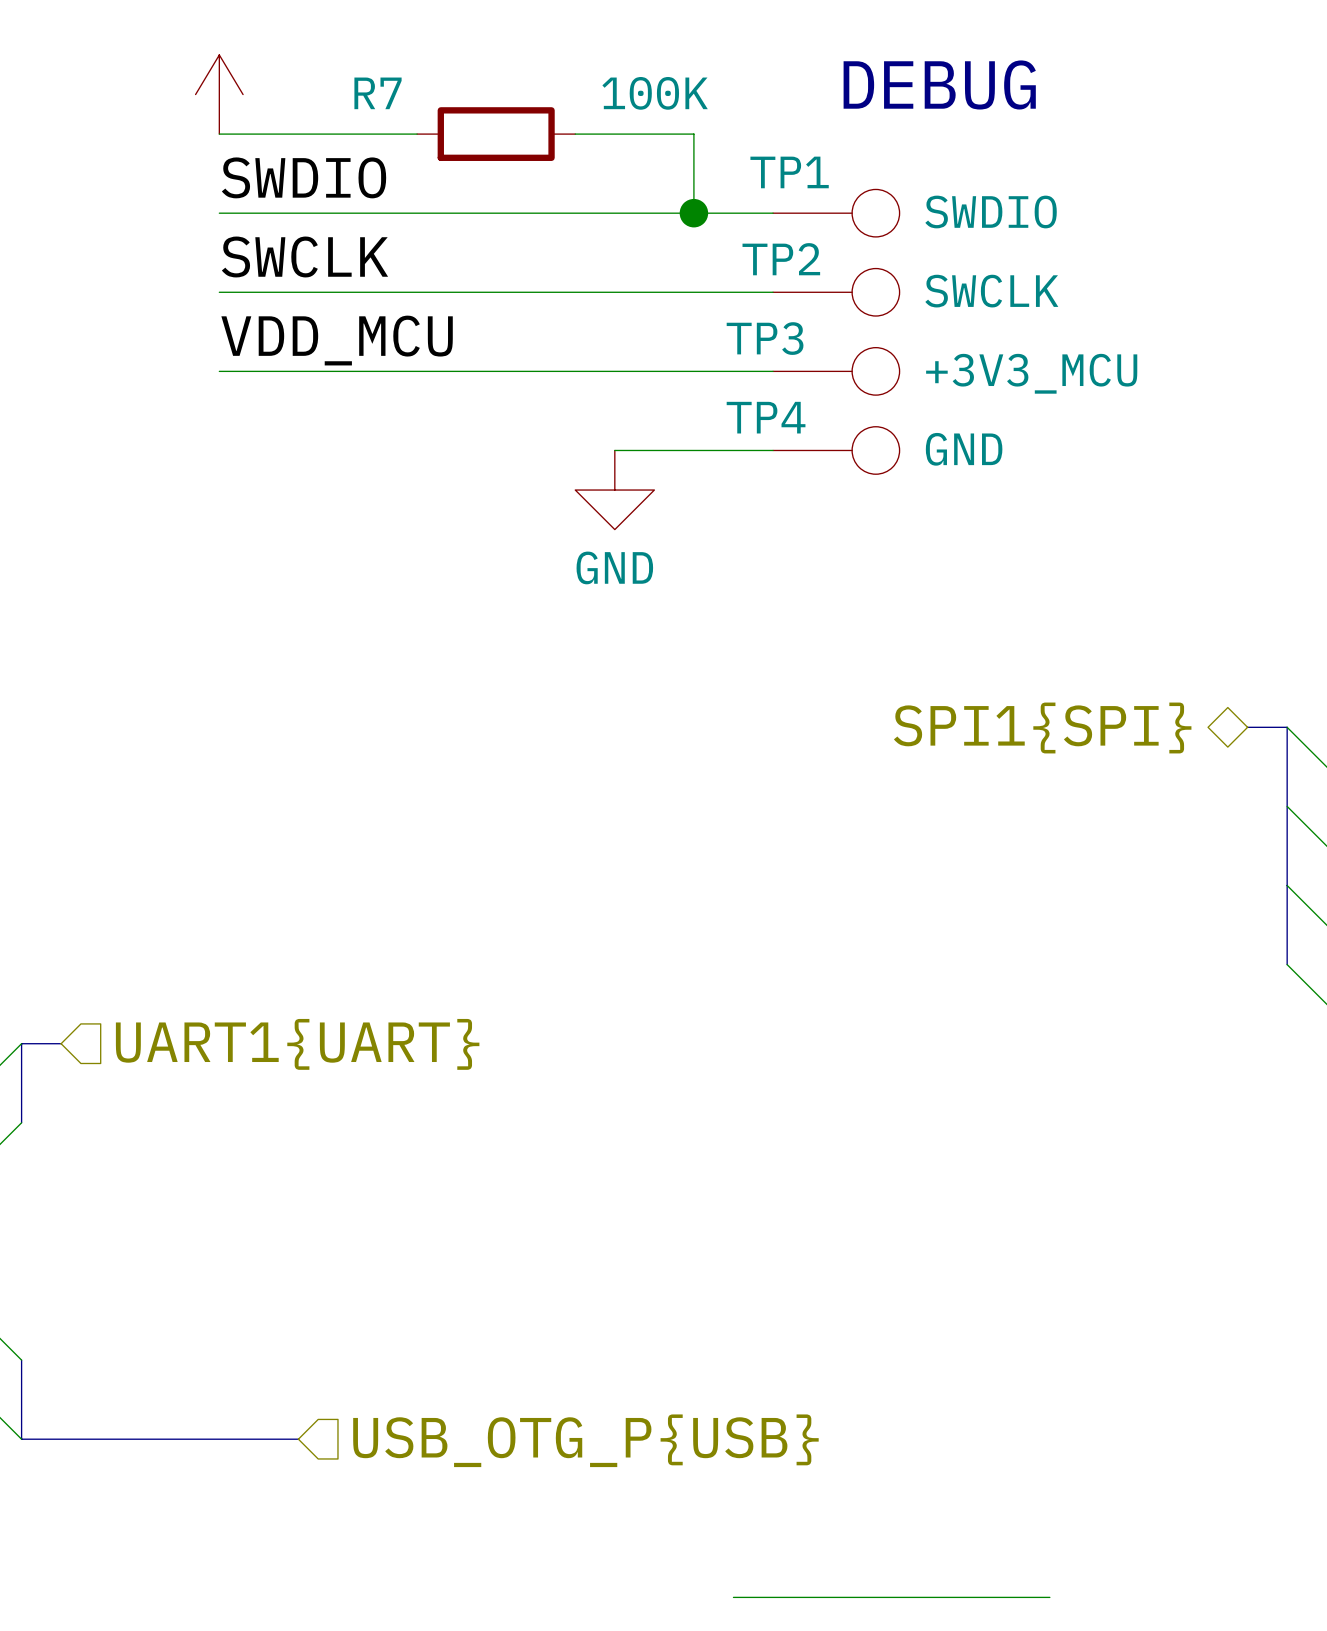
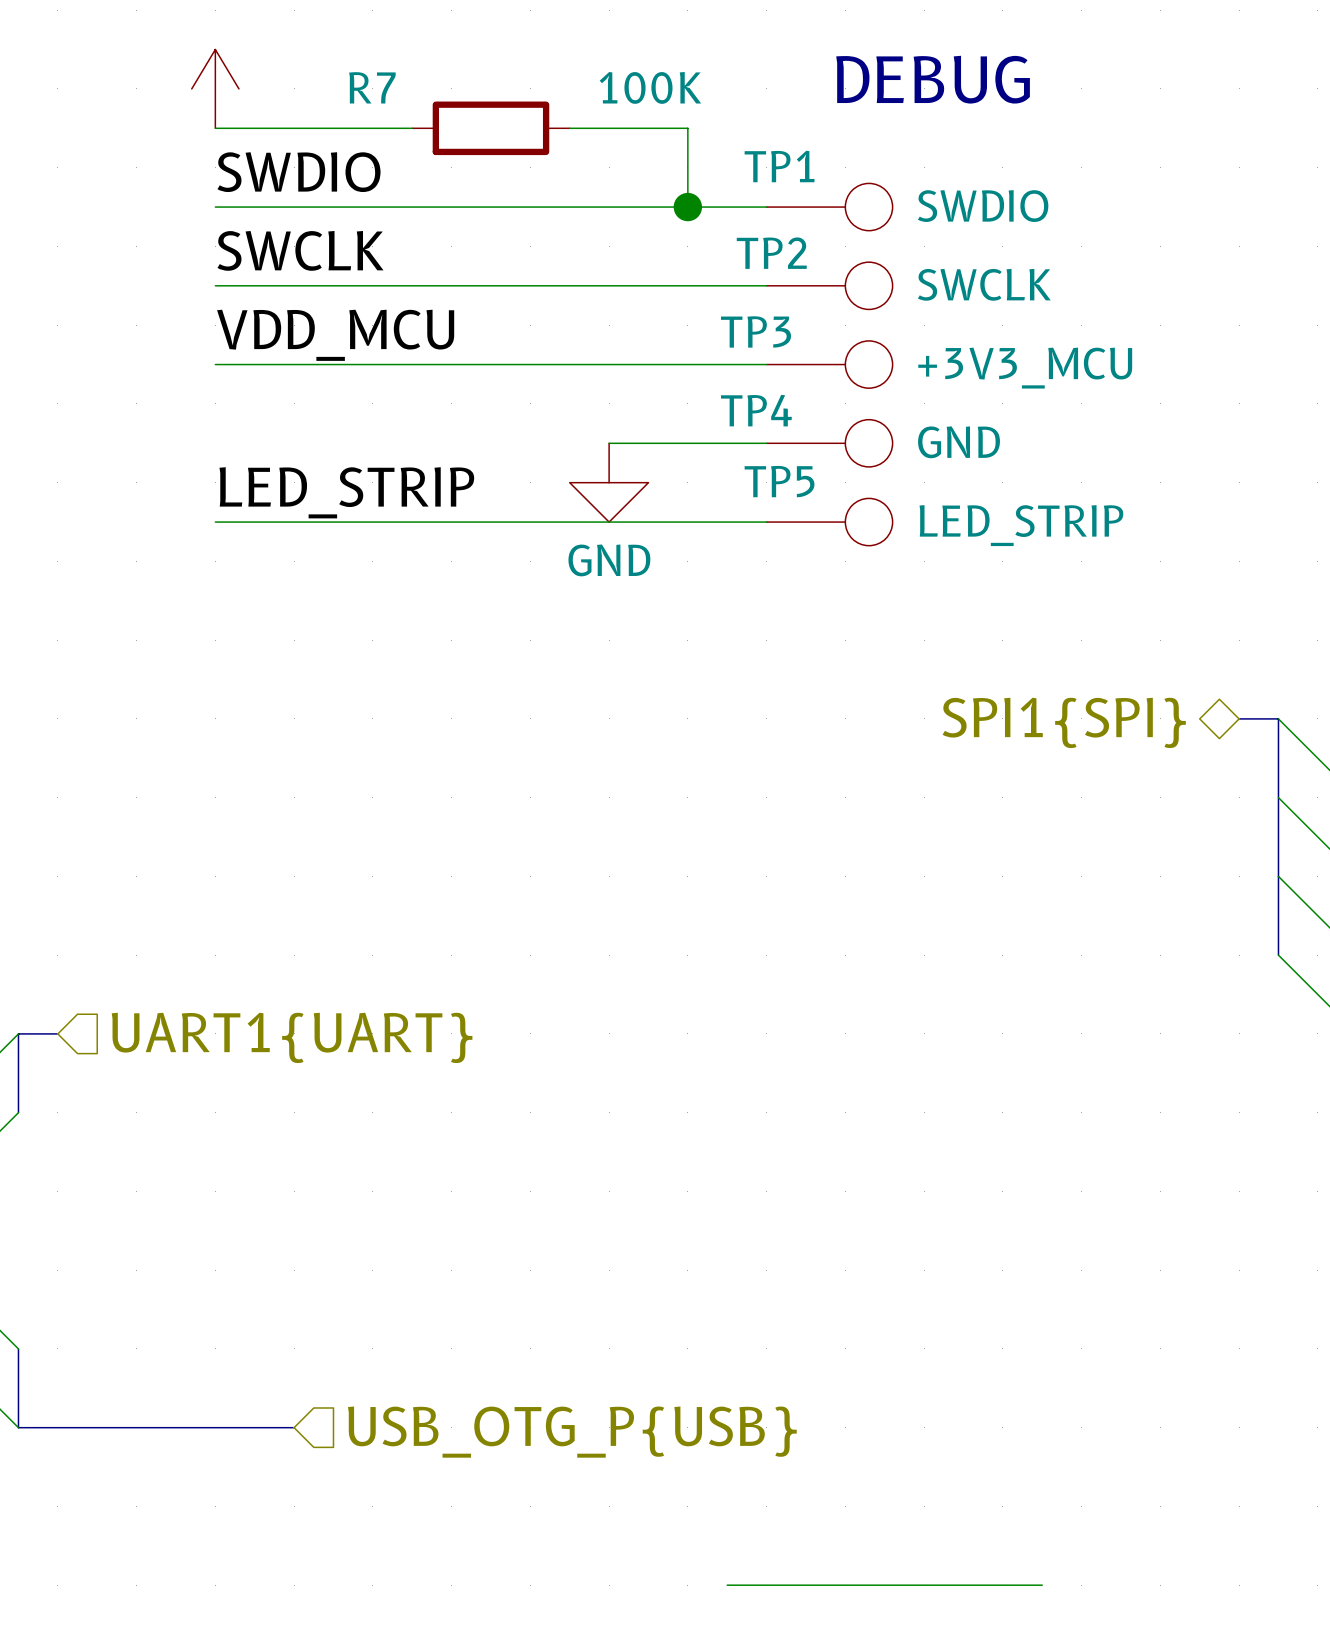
label: none -> LED_STRIP (346, 492)
wire: none -> (215, 522) (766, 522)
TP5: none -> LED_STRIP (829, 522)

